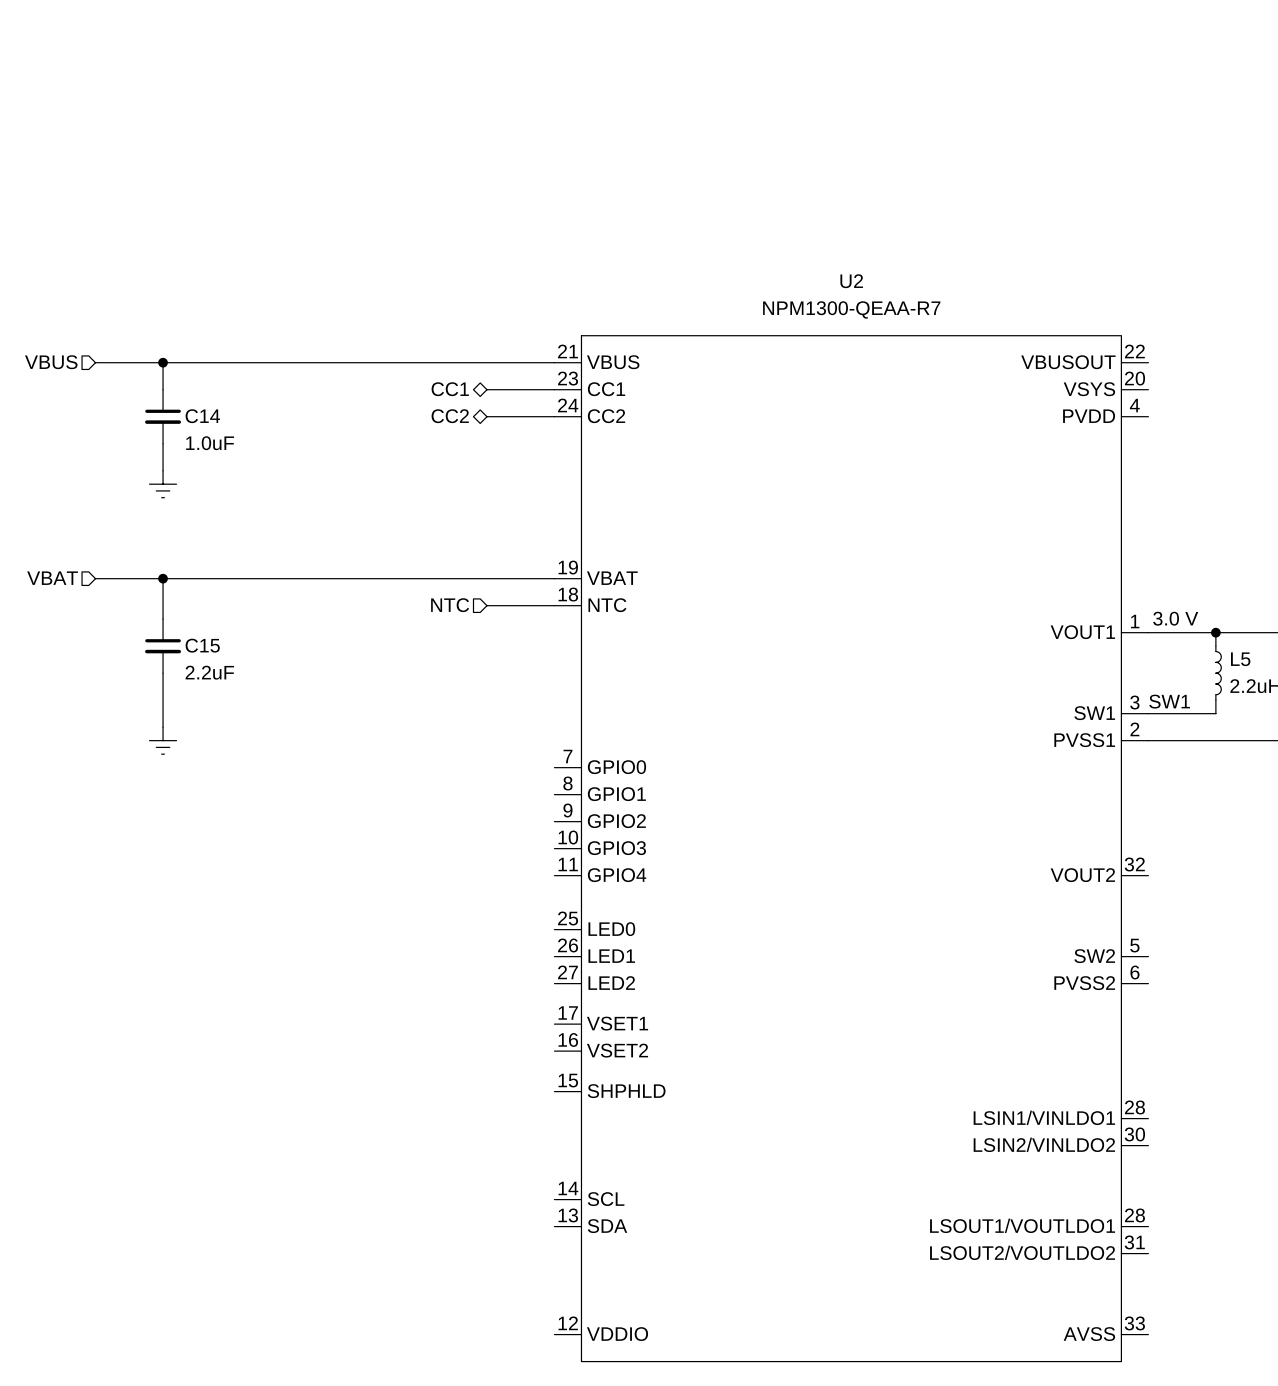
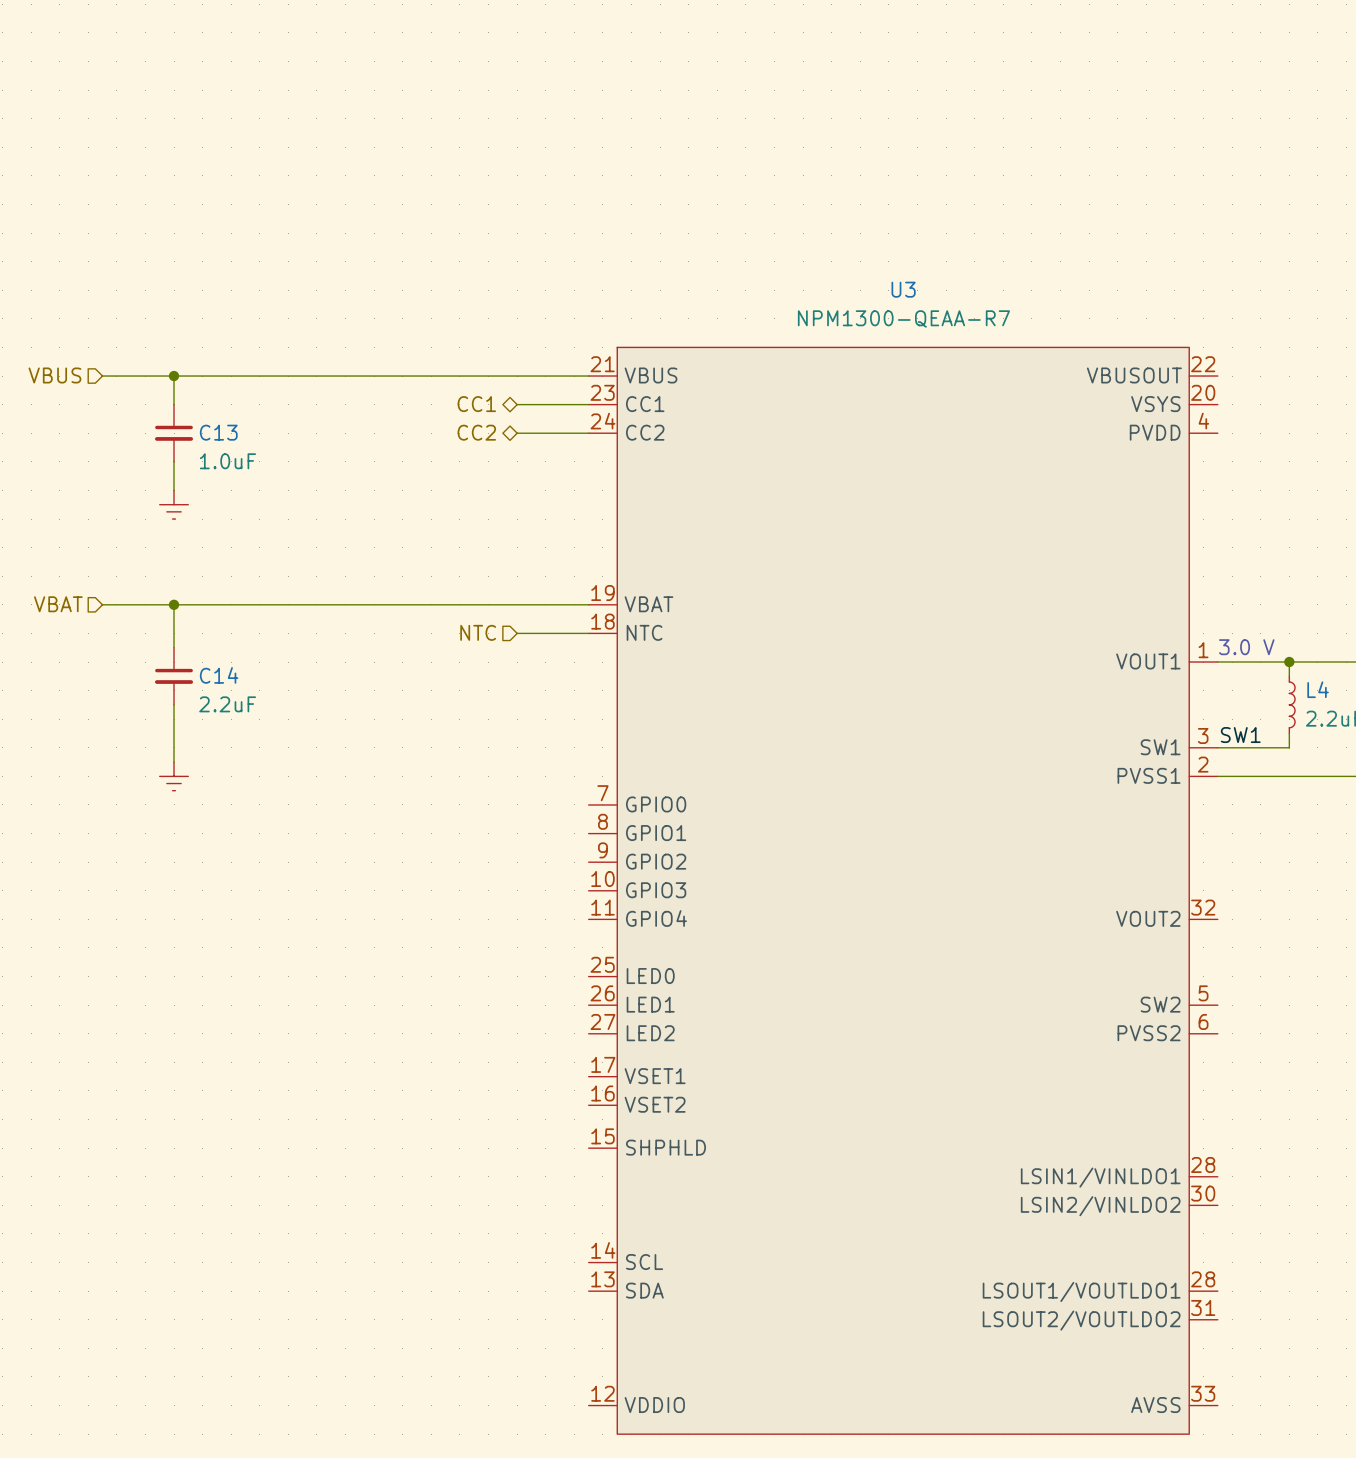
U2 name: U2 (851, 281) -> U3 (903, 289)
C14 name: C14 (202, 416) -> C13 (218, 432)
C15 name: C15 (202, 645) -> C14 (219, 675)
L5 name: L5 (1240, 659) -> L4 (1318, 689)

